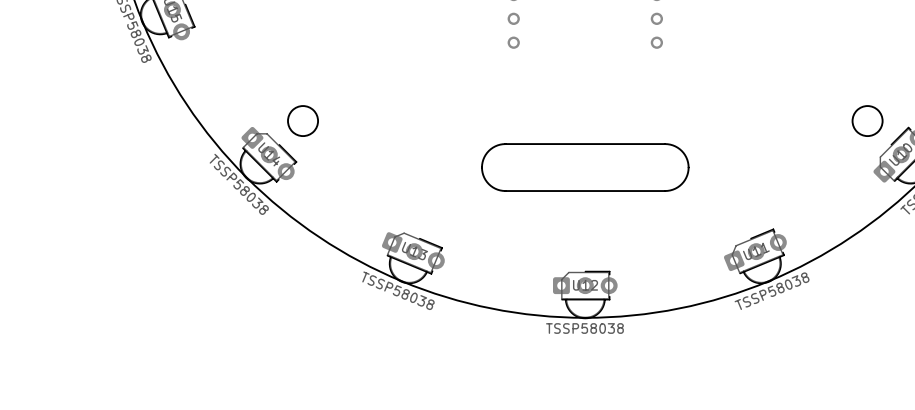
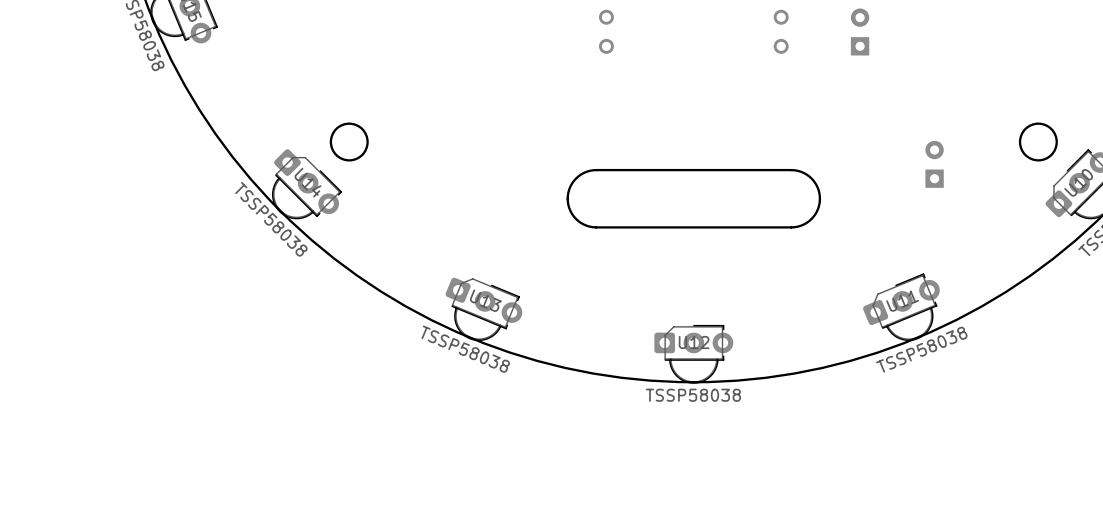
part: none -> (860, 31)
part: none -> (934, 164)

